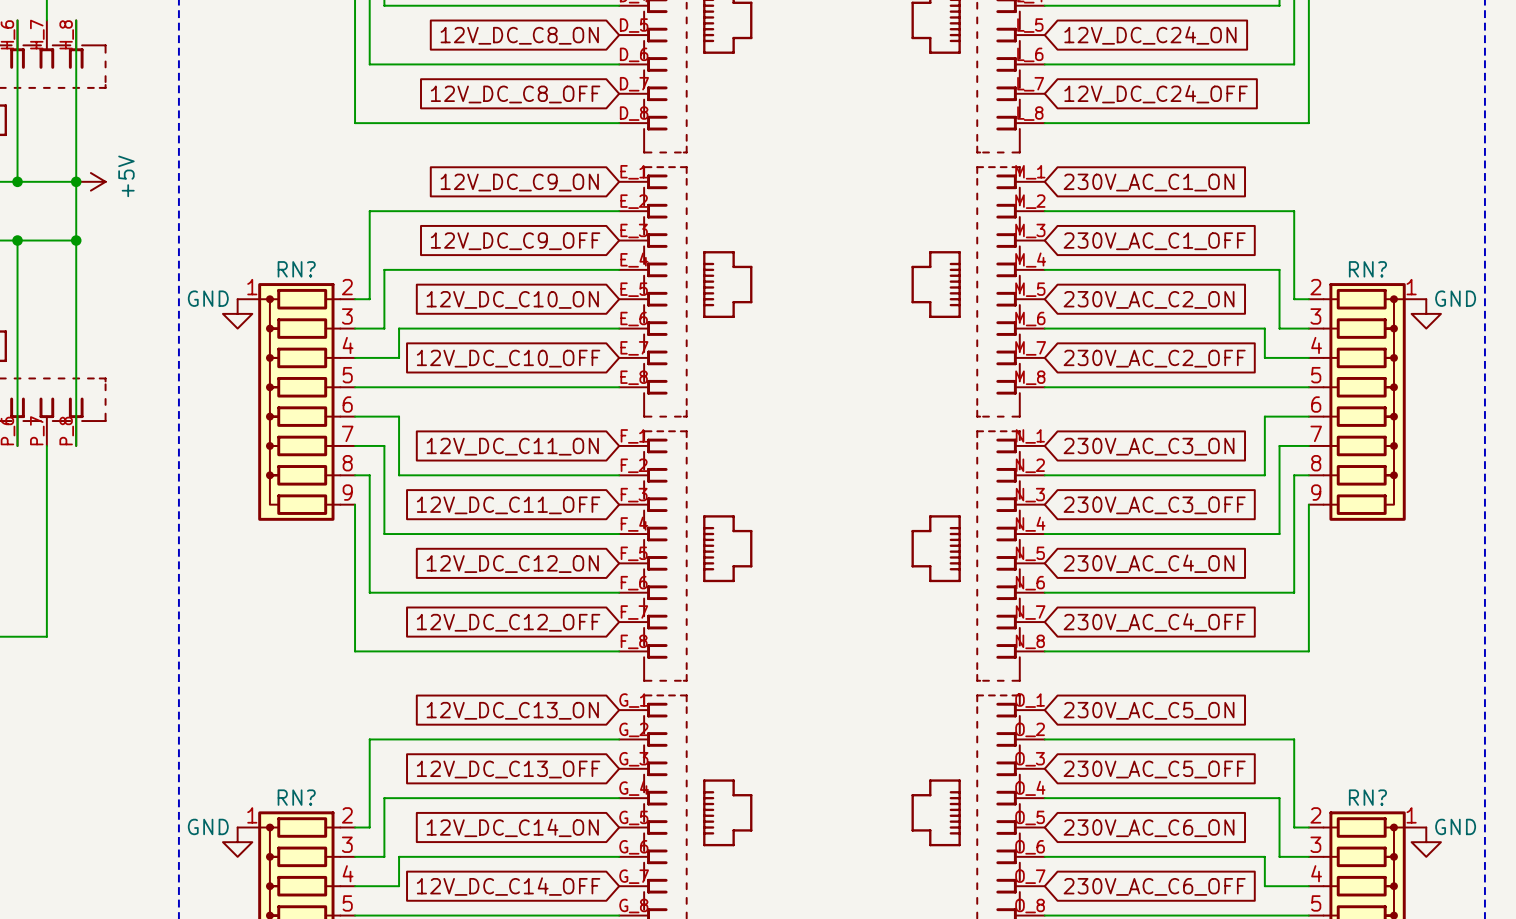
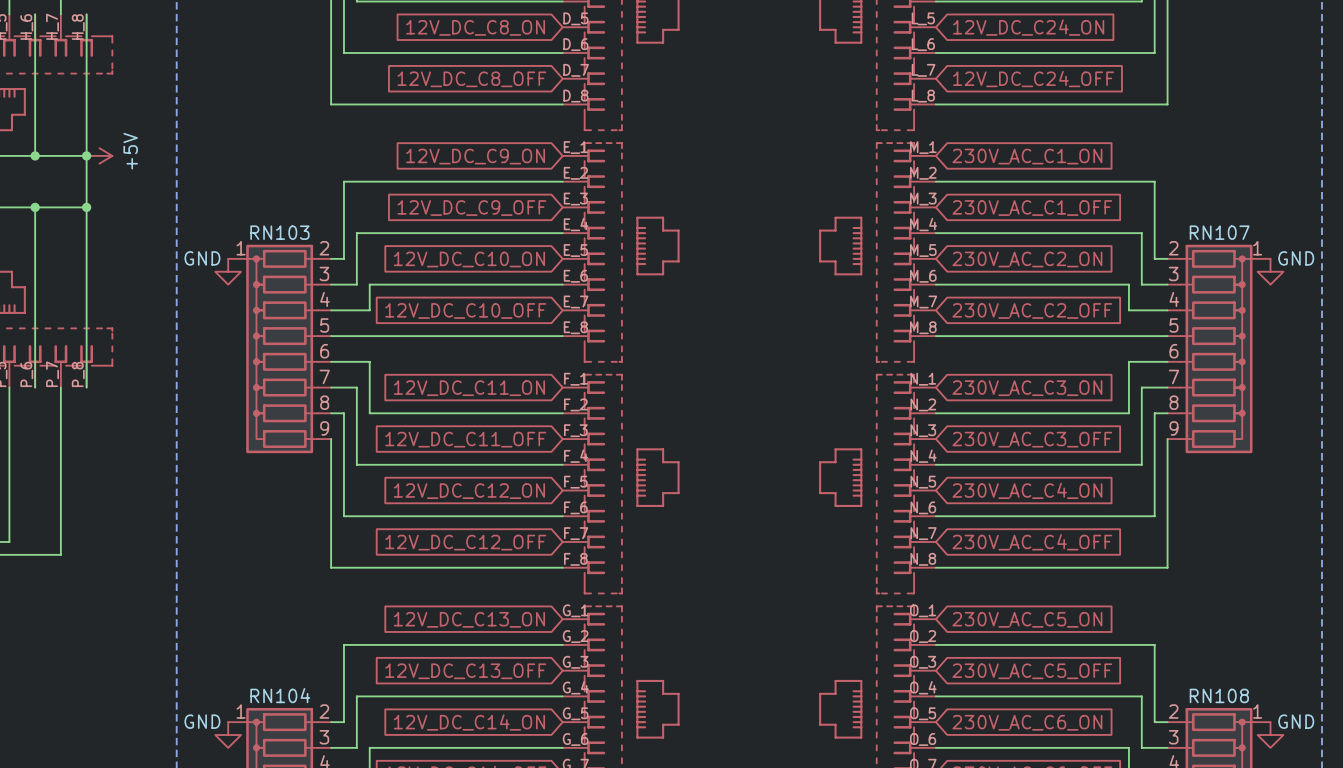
RN? name: RN? (296, 269) -> RN103 (279, 232)
RN? name: RN? (1367, 269) -> RN107 (1219, 232)
RN? name: RN? (296, 797) -> RN104 (280, 695)
RN? name: RN? (1367, 797) -> RN108 (1219, 695)

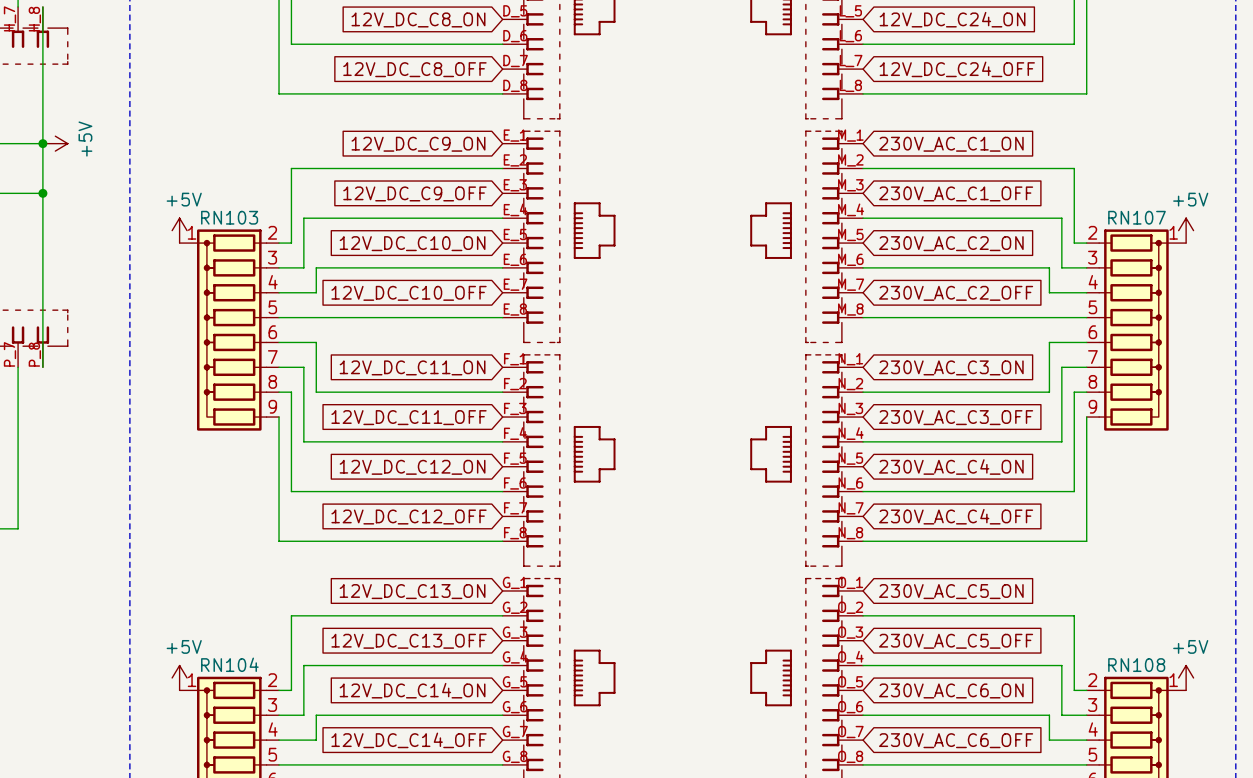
power symbol: none -> +5V (179, 230)
power symbol: none -> +5V (1186, 230)
power symbol: GND (228, 271) -> none
power symbol: GND (1270, 271) -> none
power symbol: none -> +5V (179, 677)
power symbol: none -> +5V (1186, 677)
power symbol: GND (228, 735) -> none
power symbol: GND (1270, 735) -> none

